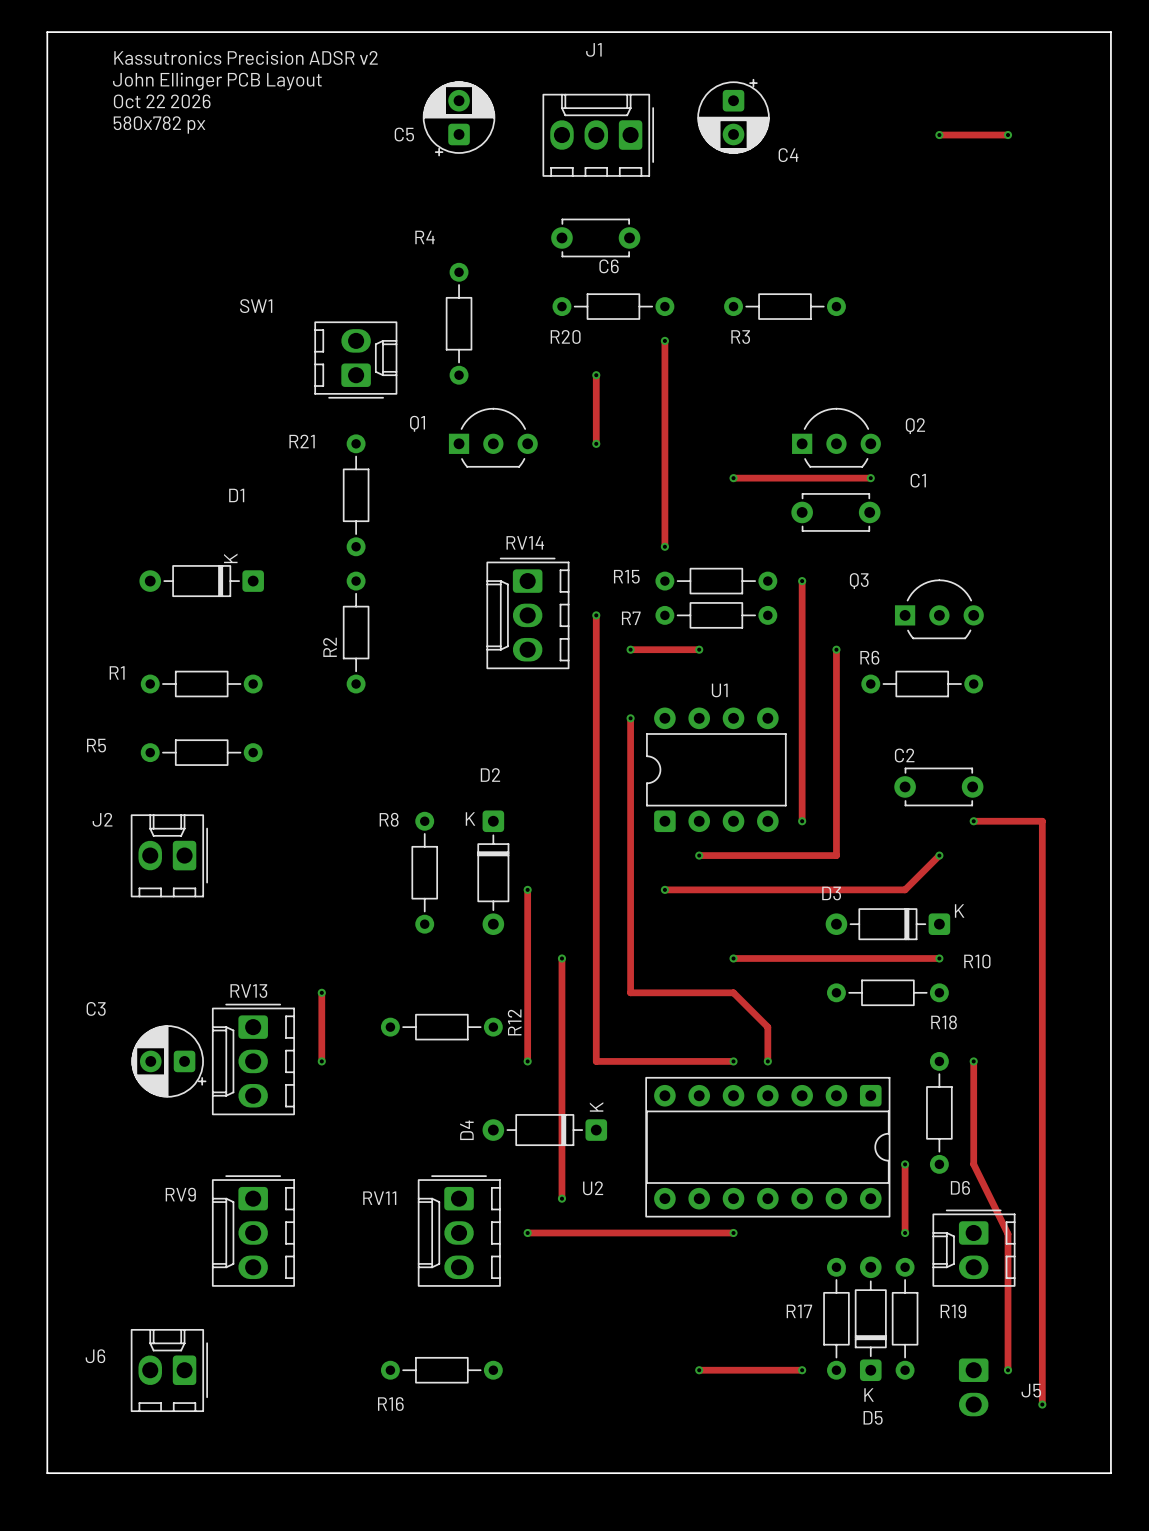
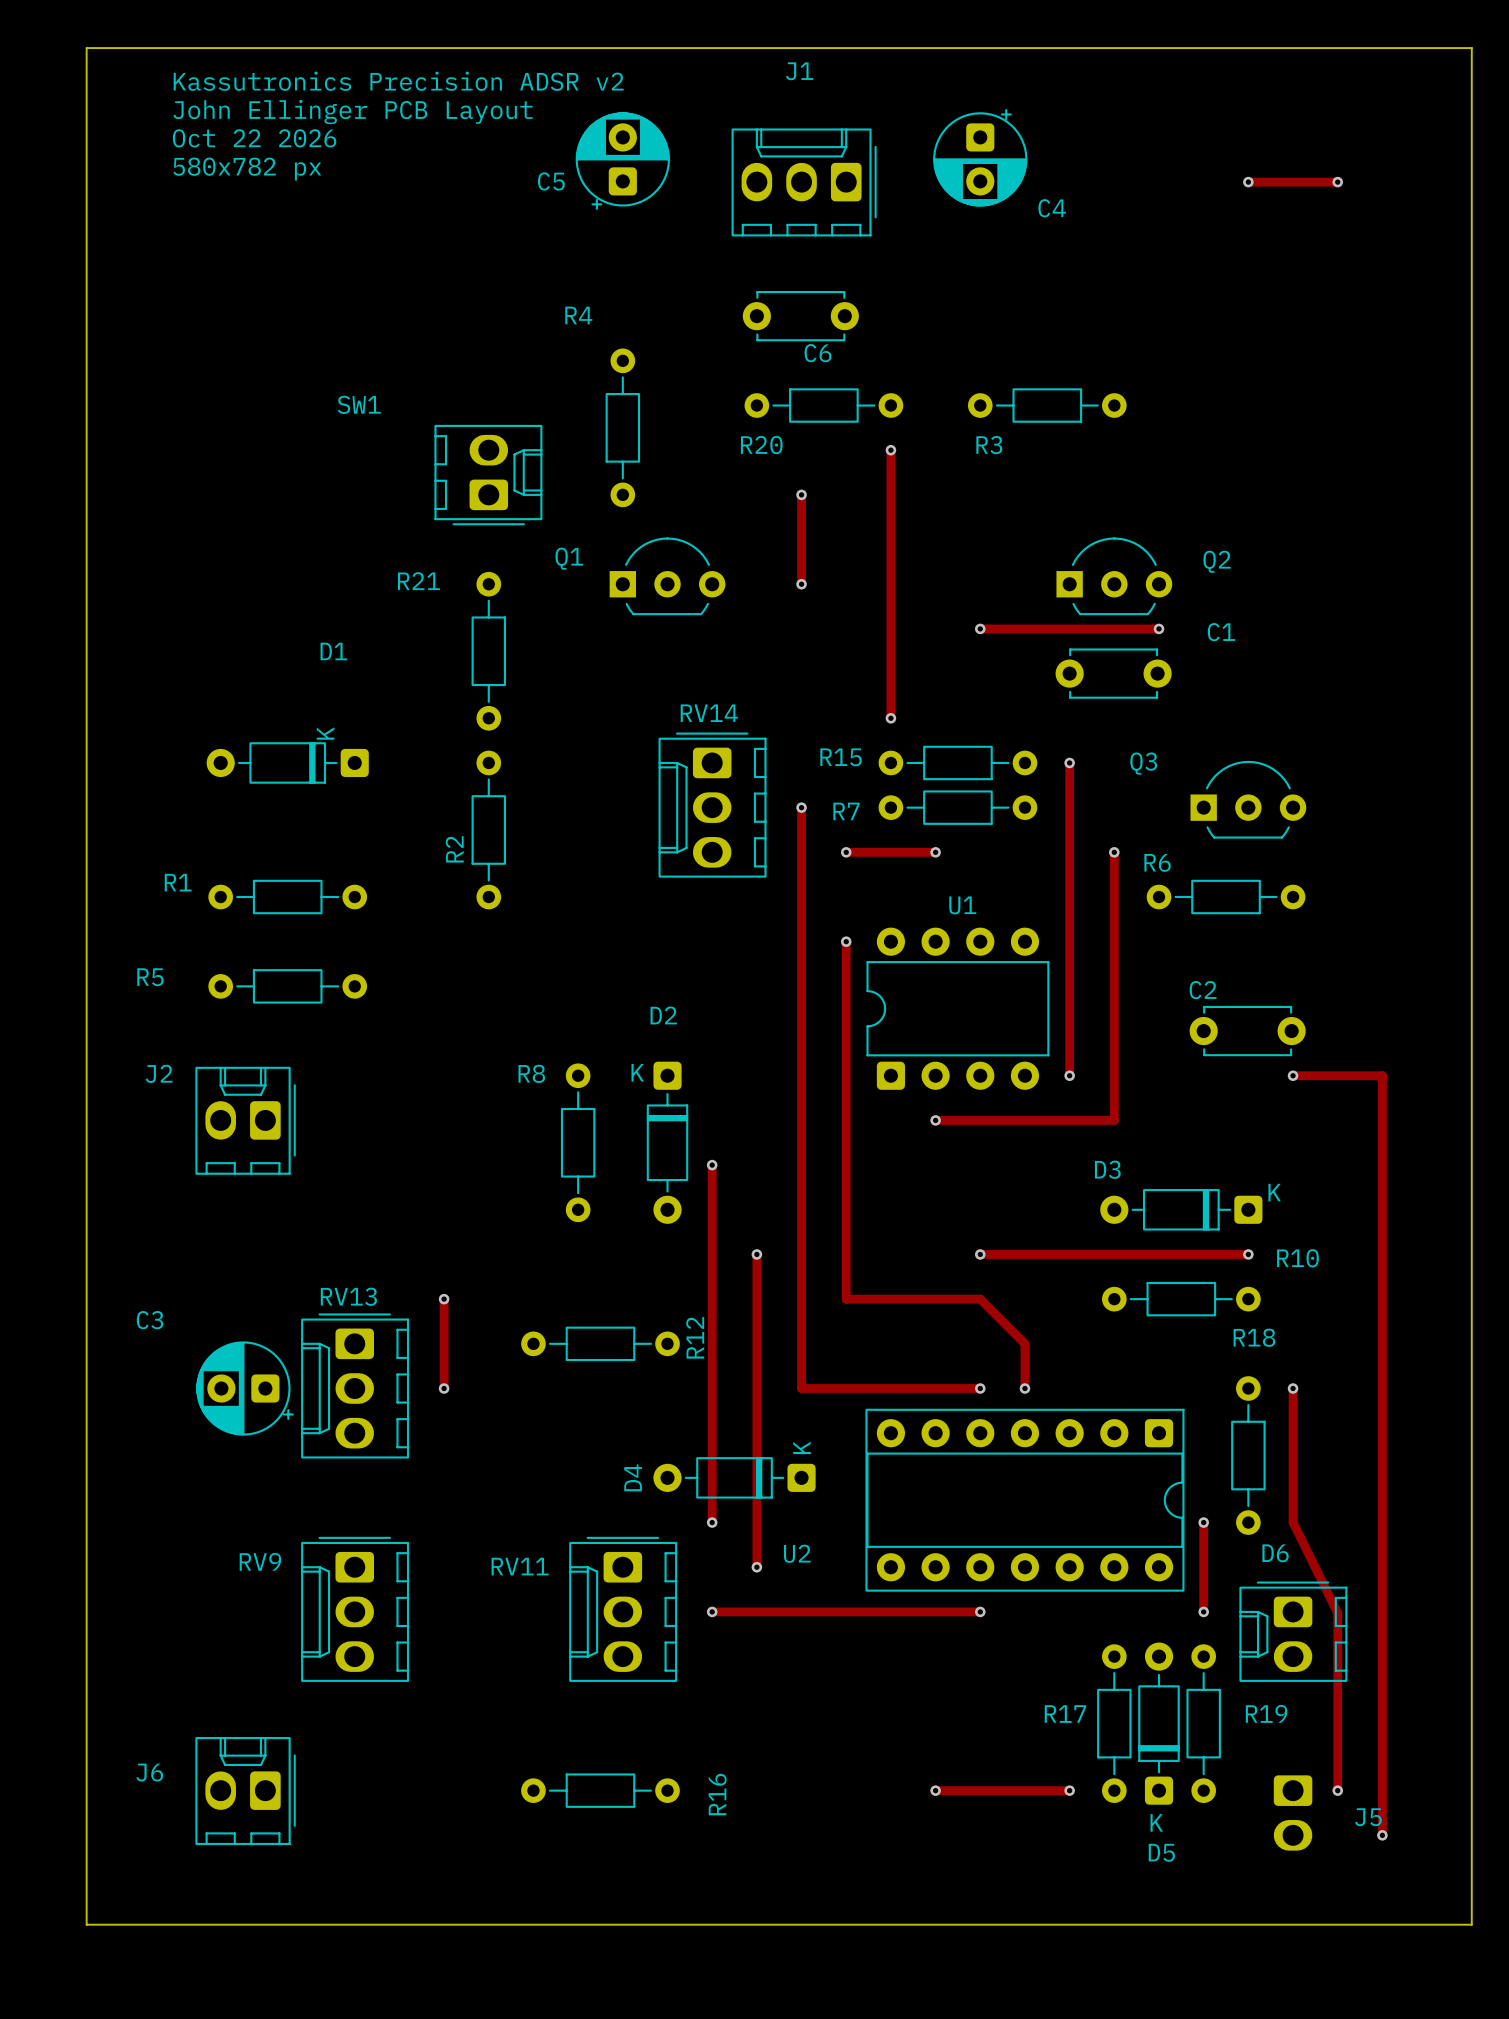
track: (939, 855) (905, 889) (664, 889) -> none
via: (939, 855) -> none
via: (664, 889) -> none
track: none -> (712, 1388) (712, 1522)
via: (527, 1061) -> none
via: none -> (712, 1522)
R16 name rotation: 0° (390, 1404) -> 90° counterclockwise (717, 1794)
R16 name position: R16 (390, 1404) -> R16 (717, 1794)

